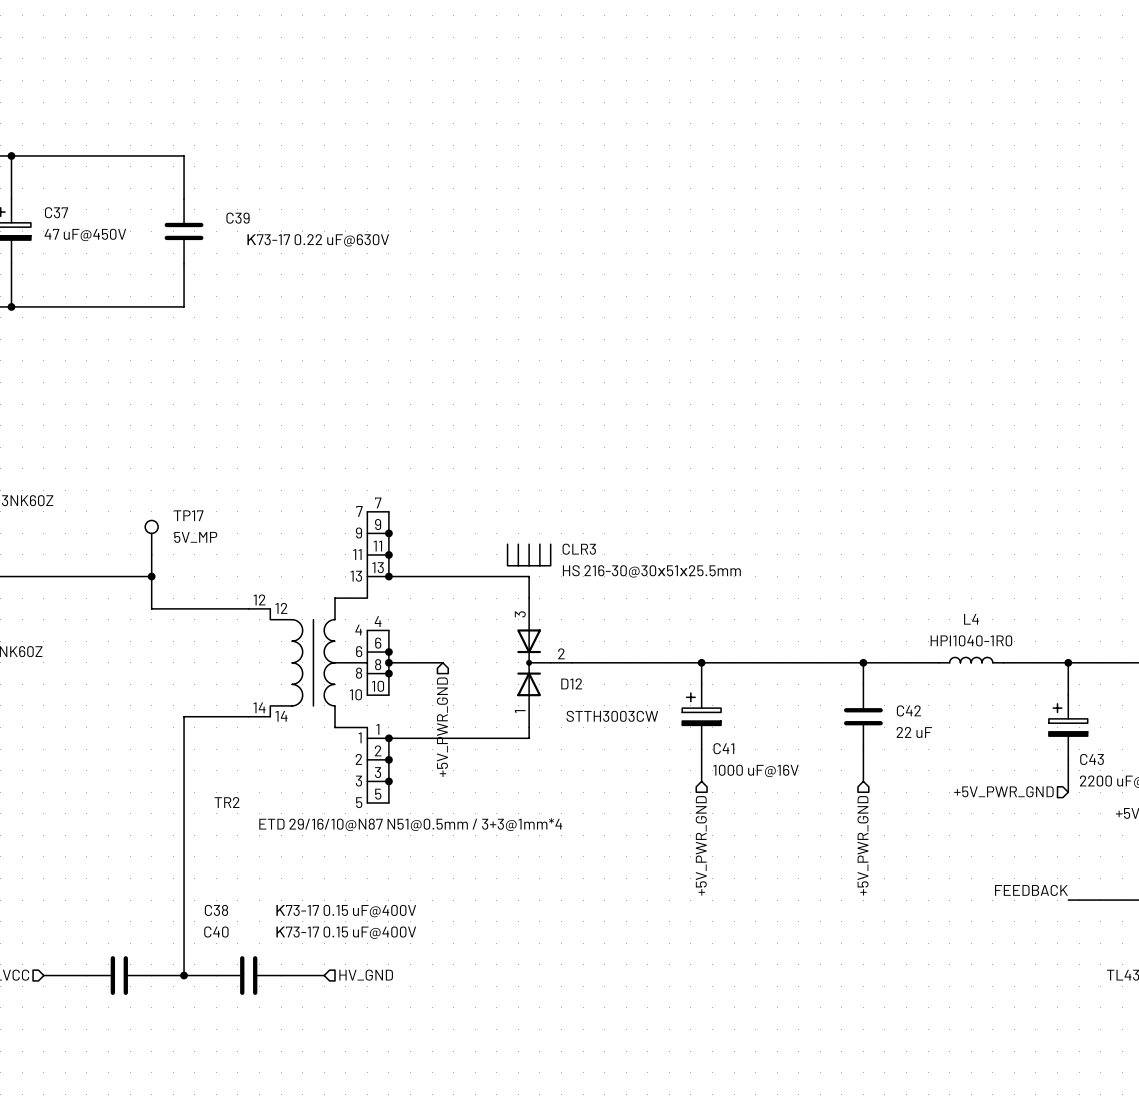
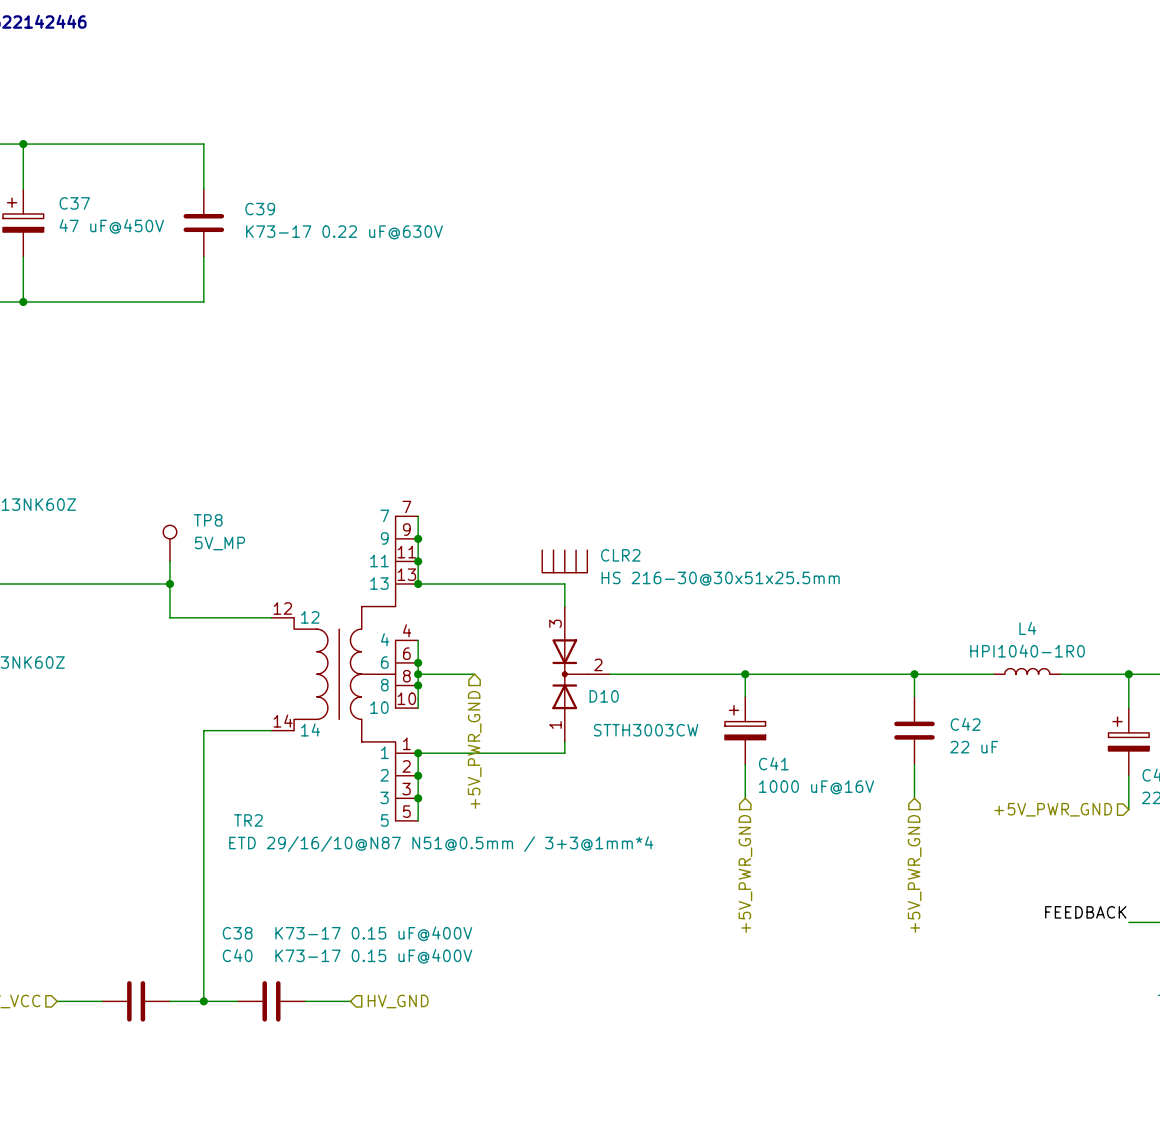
TP17 name: TP17 (188, 515) -> TP8 (208, 520)
CLR3 name: CLR3 (579, 549) -> CLR2 (620, 555)
D12 name: D12 (571, 683) -> D10 (604, 696)

